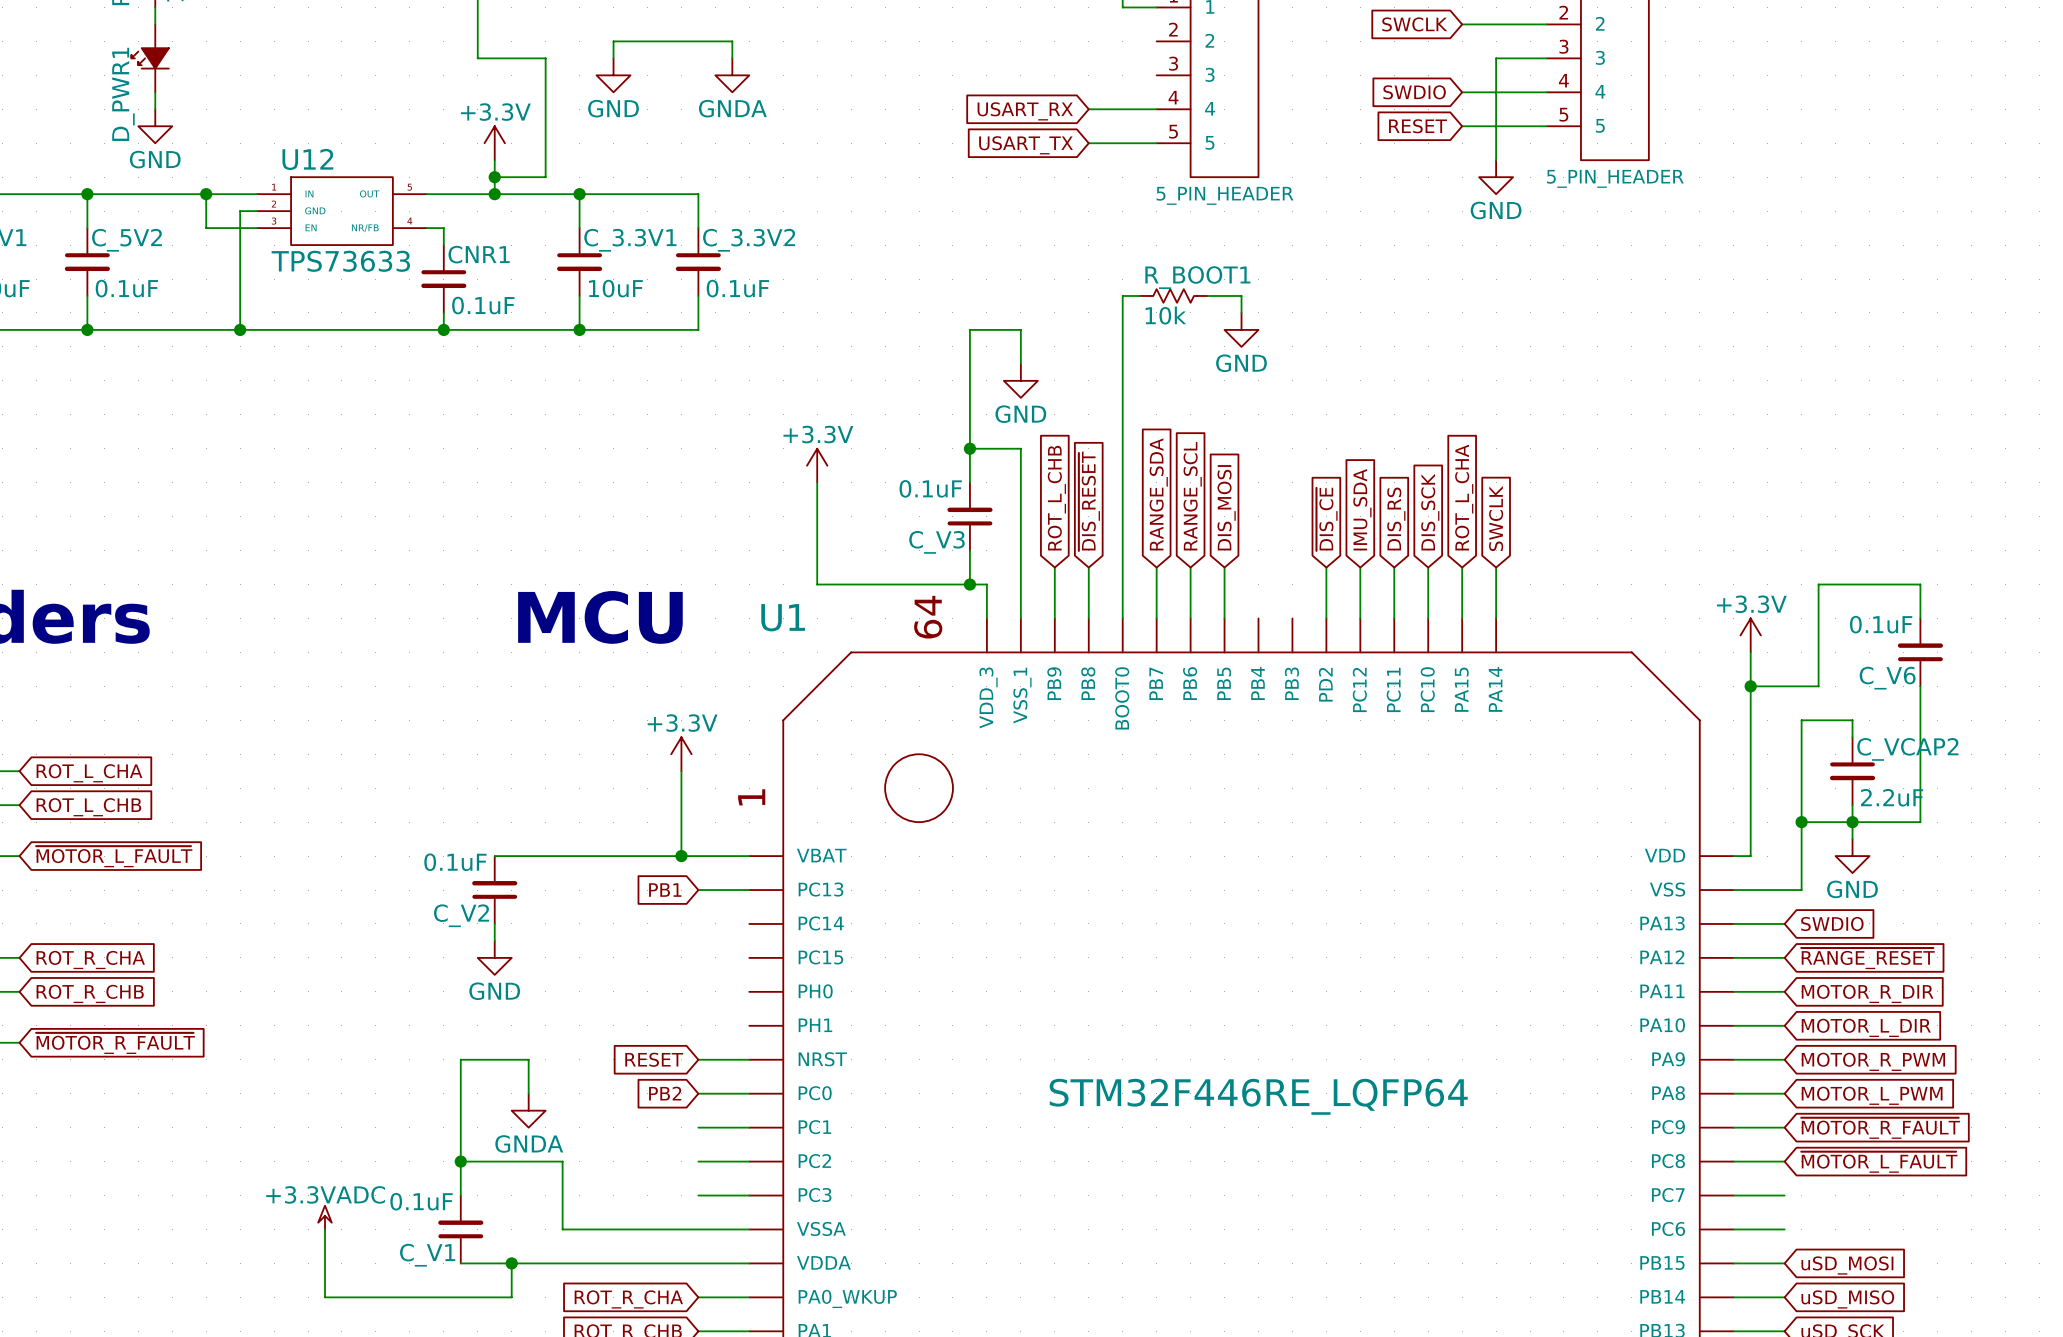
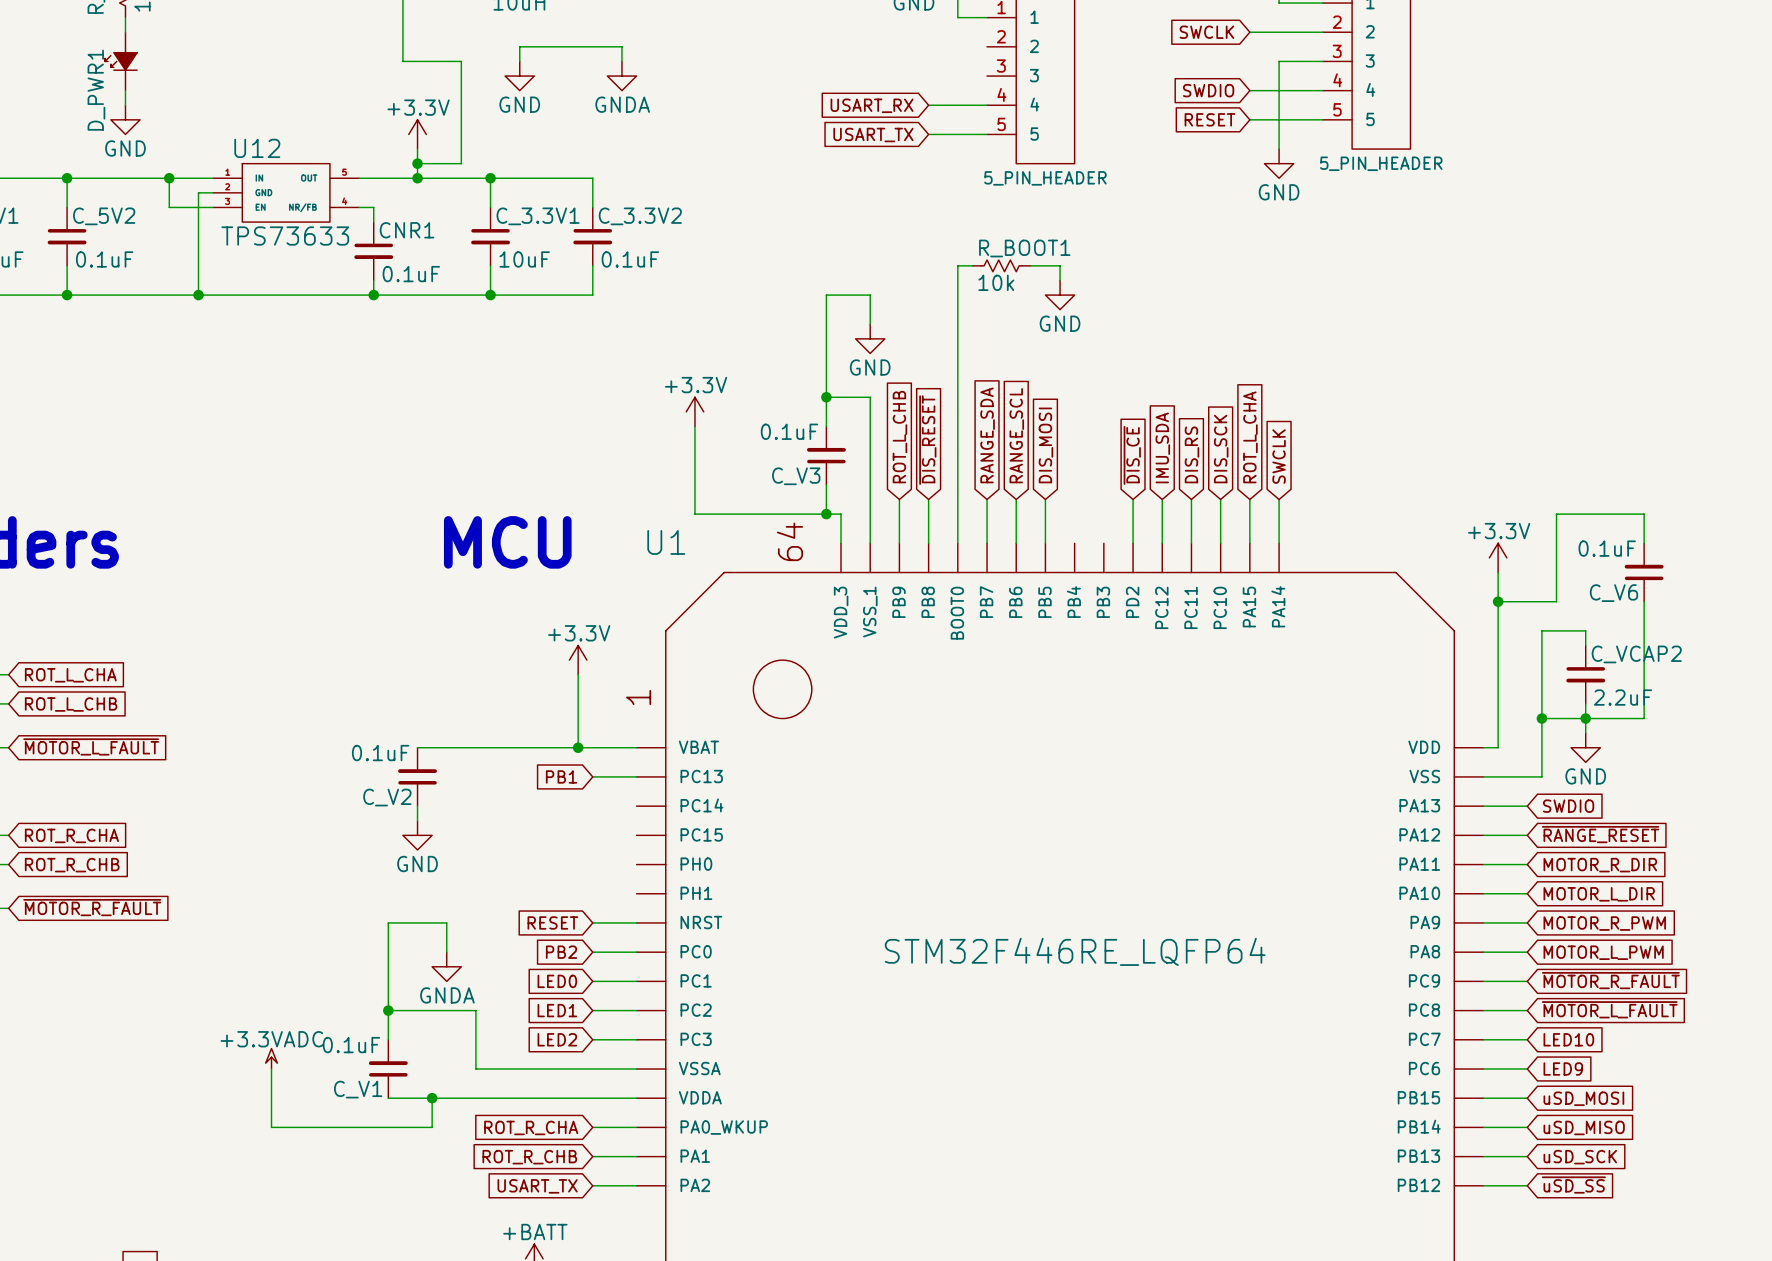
global label: none -> LED0 (557, 981)
global label: none -> LED1 (557, 1010)
global label: none -> LED2 (557, 1039)
global label: none -> LED10 (1568, 1039)
global label: none -> LED9 (1563, 1068)

